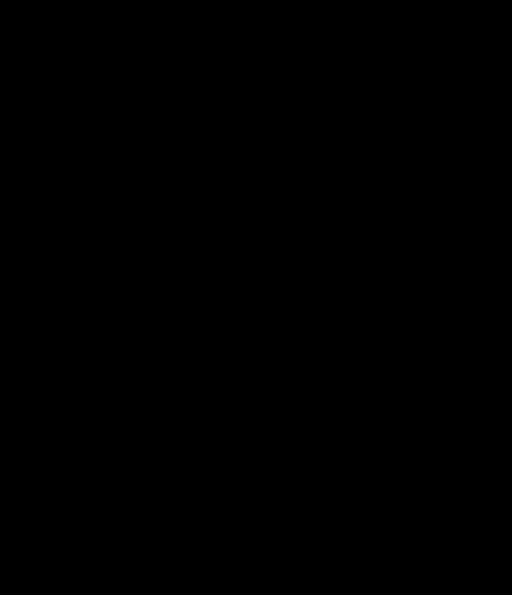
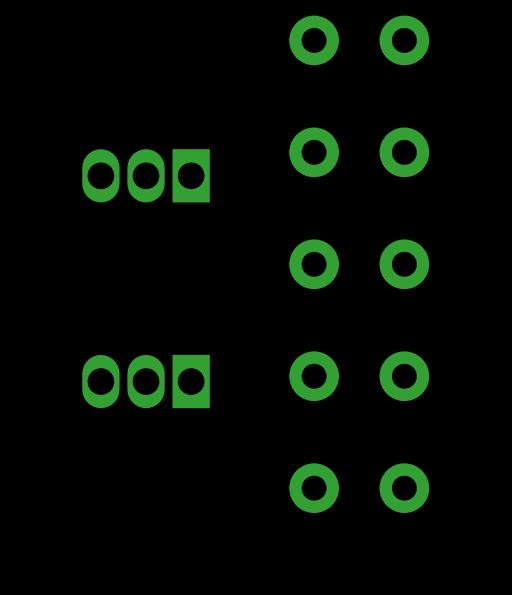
part: none -> (359, 40)
part: none -> (359, 152)
part: none -> (146, 175)
part: none -> (359, 264)
part: none -> (359, 376)
part: none -> (146, 381)
part: none -> (359, 488)

